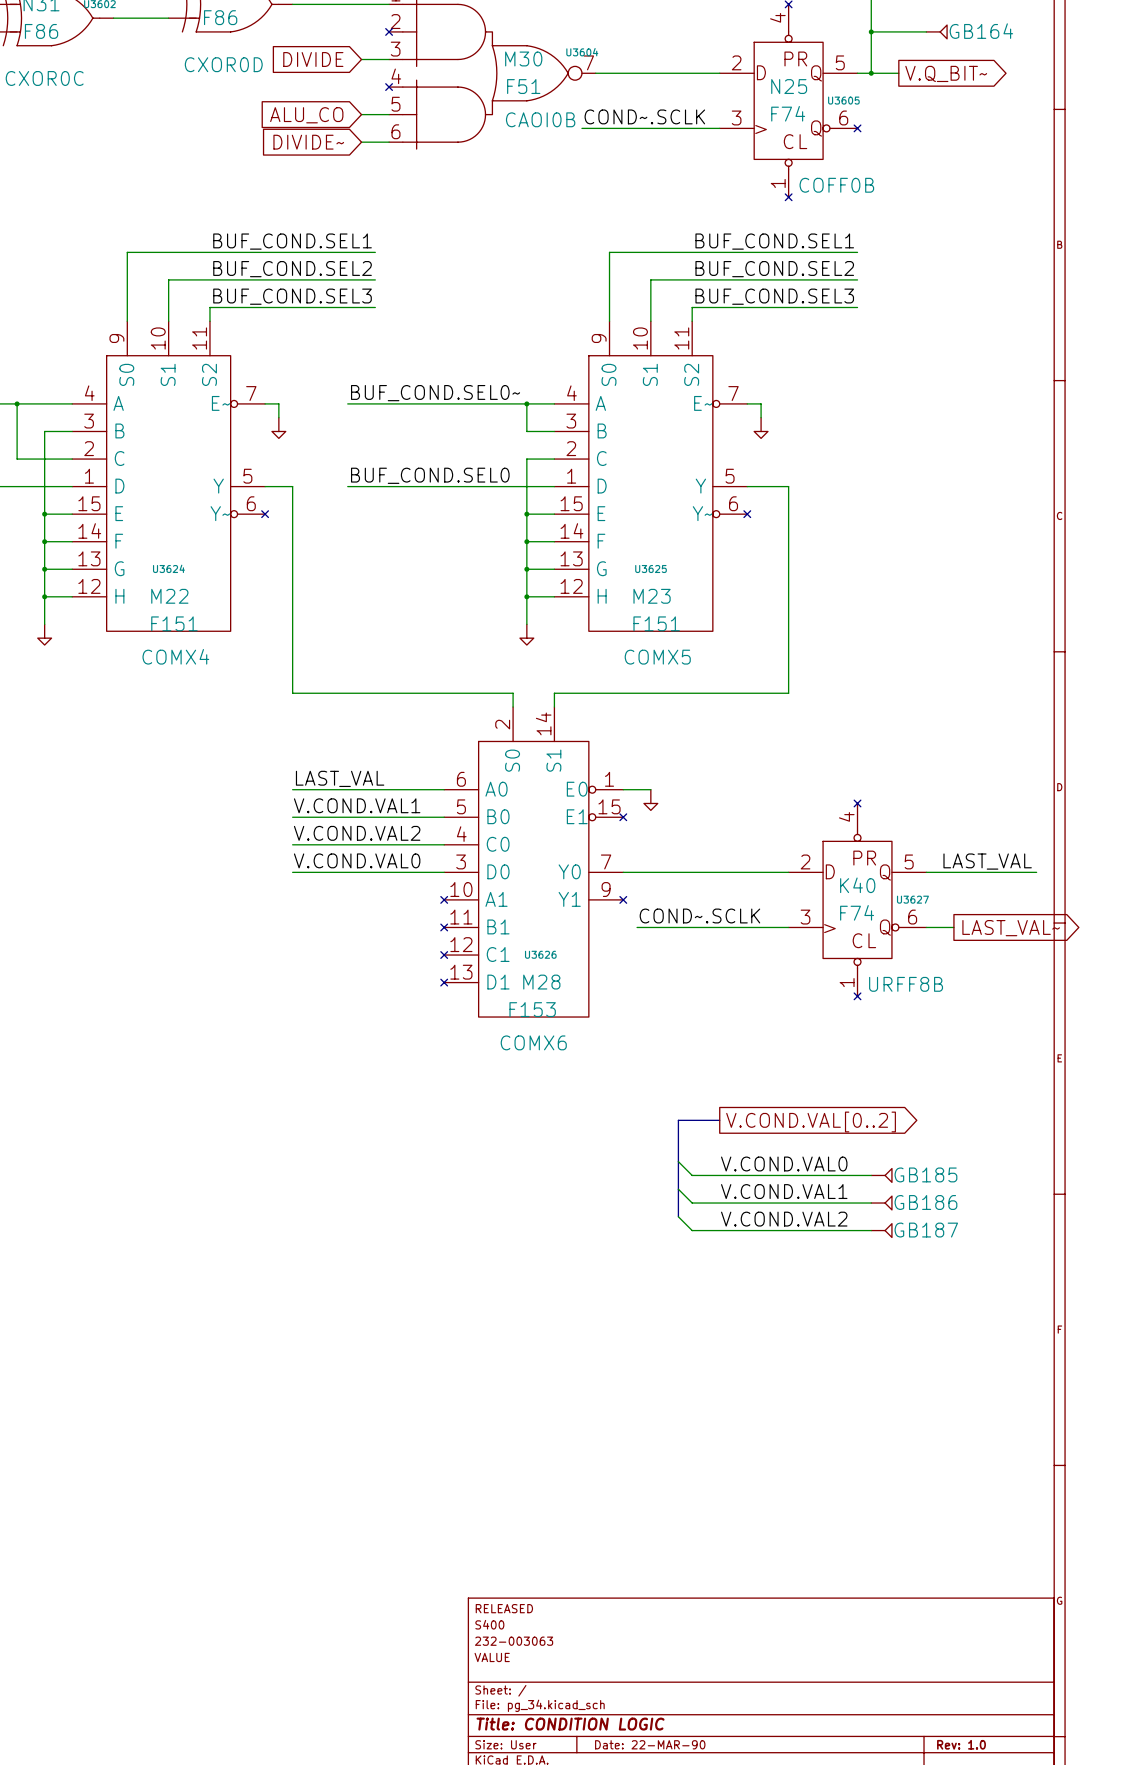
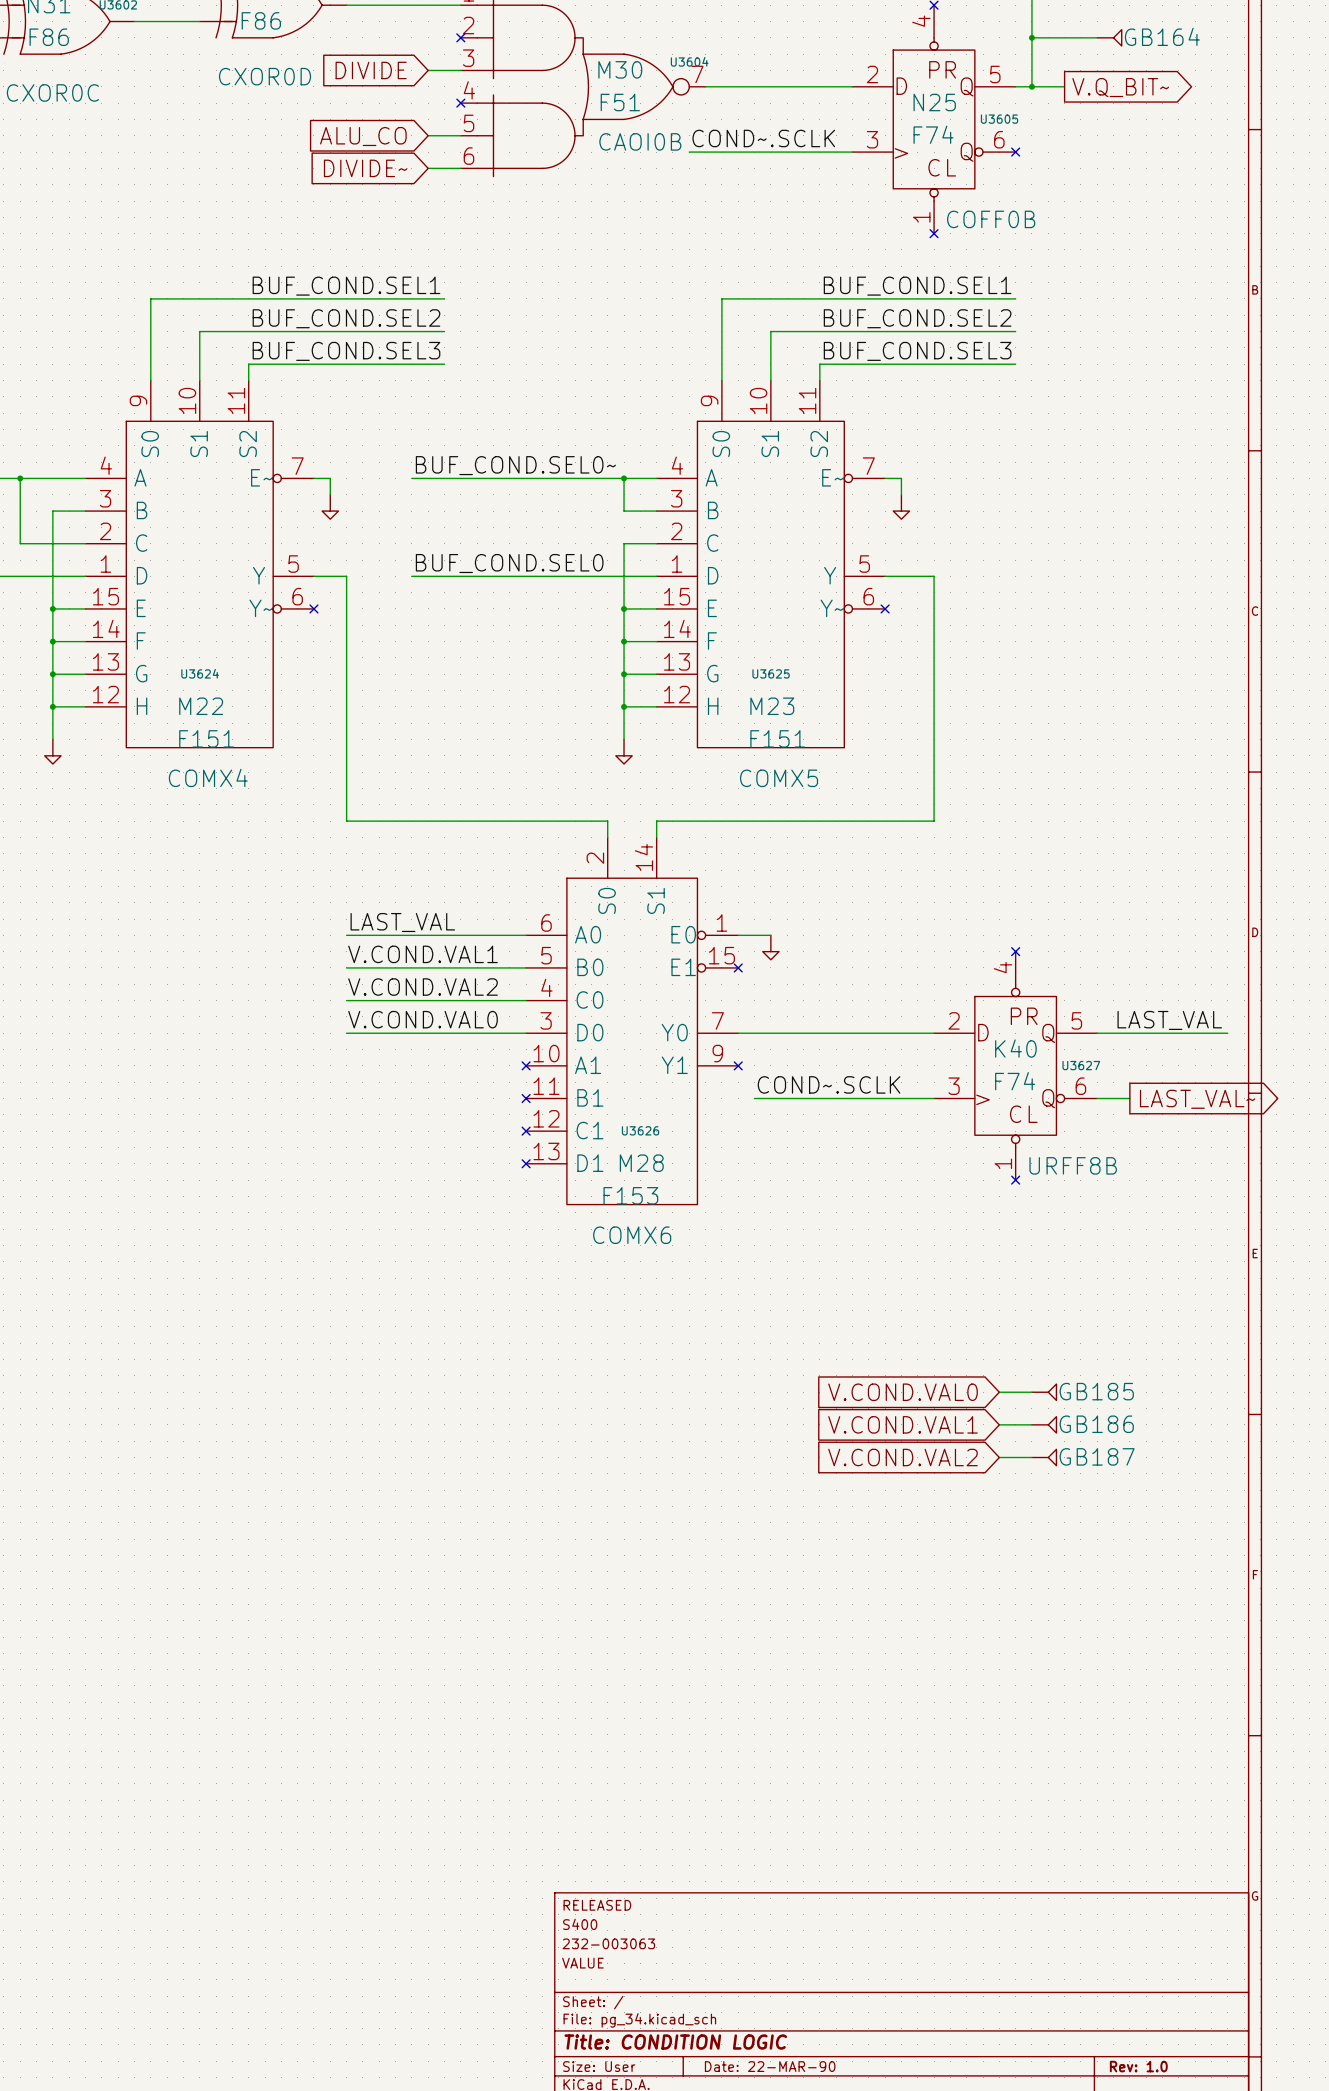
bus: (719, 1120) (678, 1120) (678, 1216) -> none
global label: V.COND.VAL[0..2] (811, 1121) -> none
wire: (678, 1161) (692, 1175) (843, 1175) -> none
label: V.COND.VAL0 (784, 1163) -> none
global label: none -> V.COND.VAL0 (903, 1392)
wire: (678, 1189) (692, 1203) (843, 1203) -> none
label: V.COND.VAL1 (784, 1191) -> none
global label: none -> V.COND.VAL1 (903, 1424)
wire: (678, 1216) (692, 1230) (843, 1230) -> none
label: V.COND.VAL2 (784, 1219) -> none
global label: none -> V.COND.VAL2 (903, 1457)

